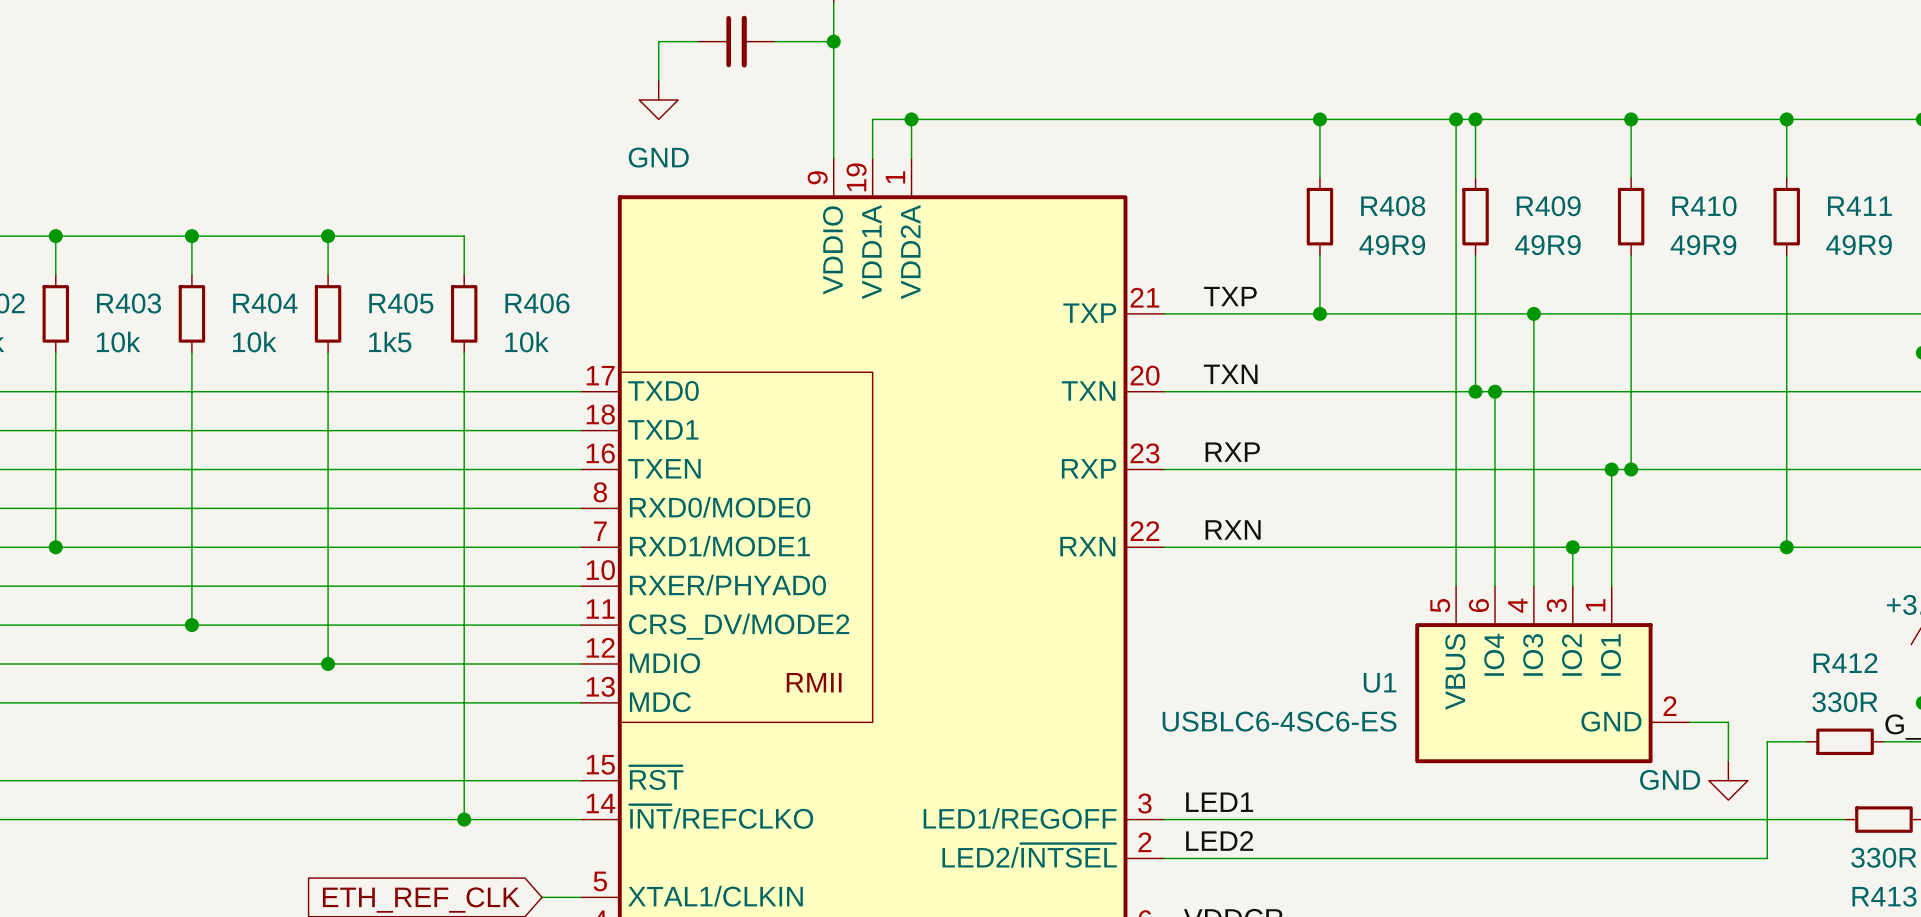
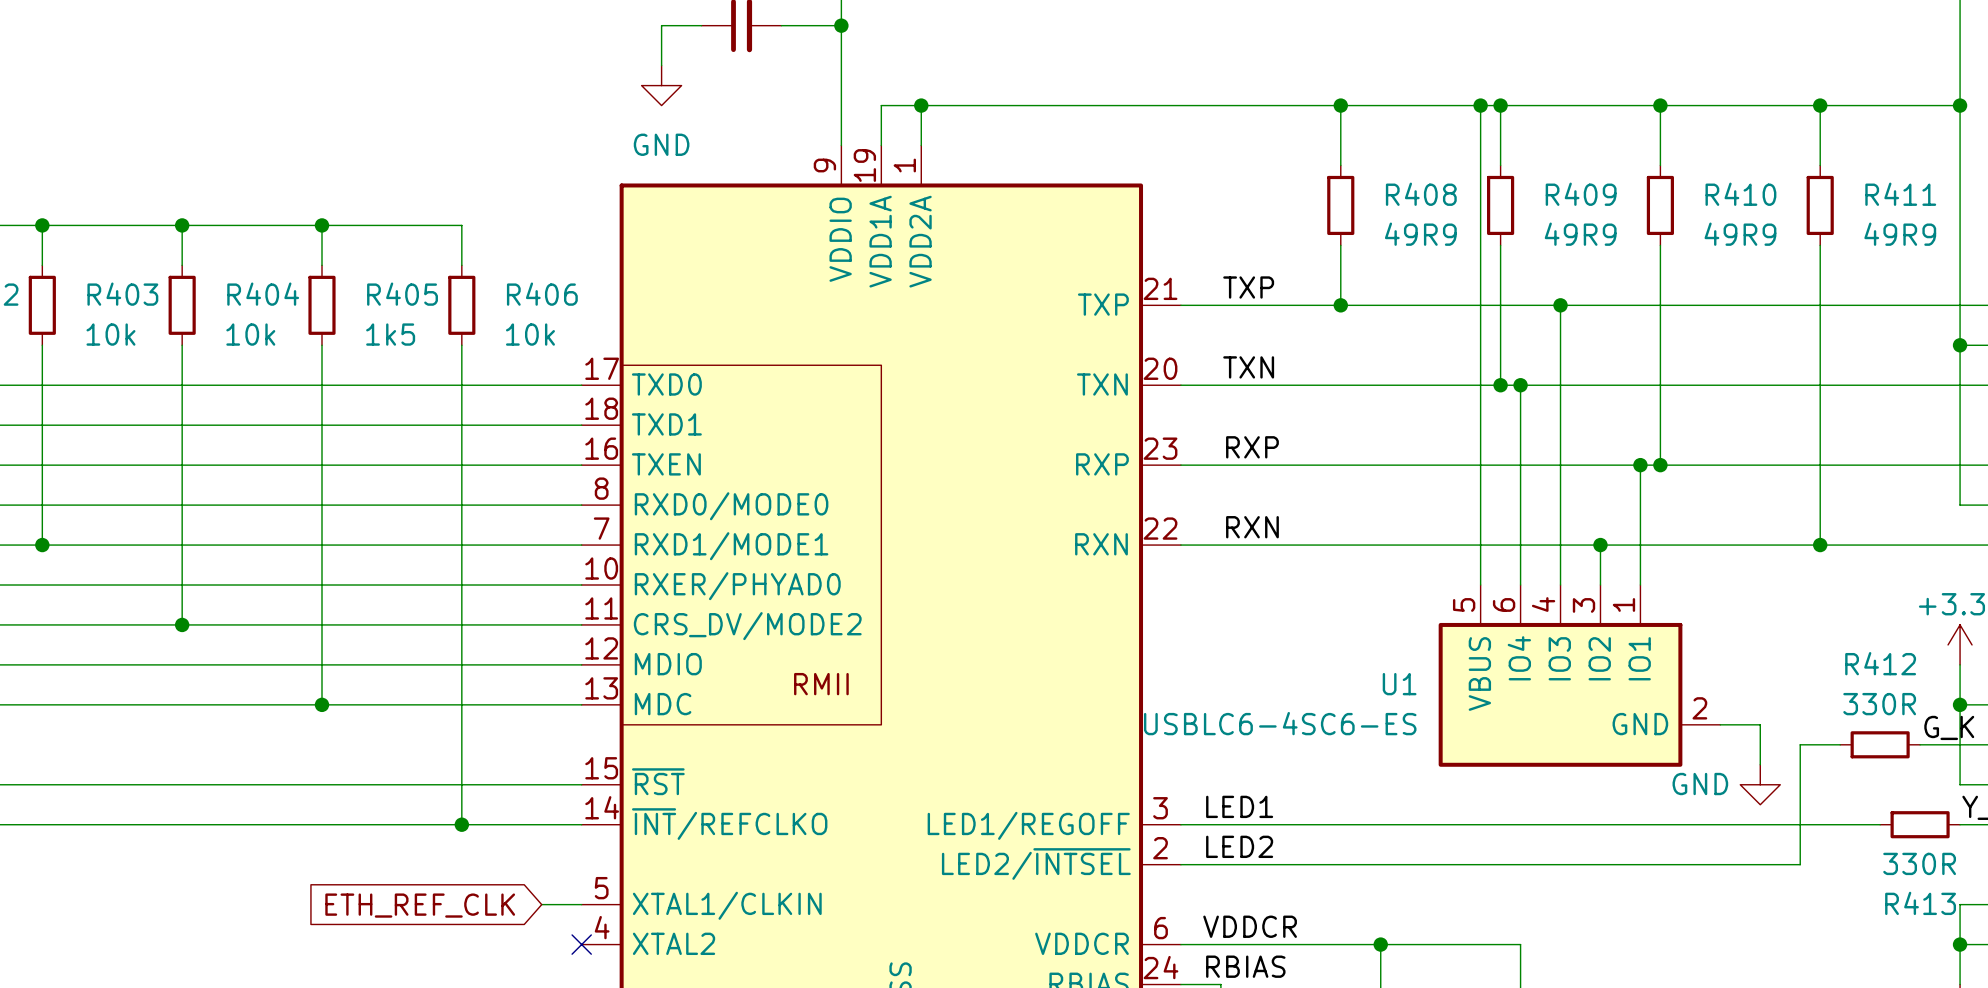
wire: none -> (322, 664) (322, 704)
junction position: (328, 663) -> (322, 704)

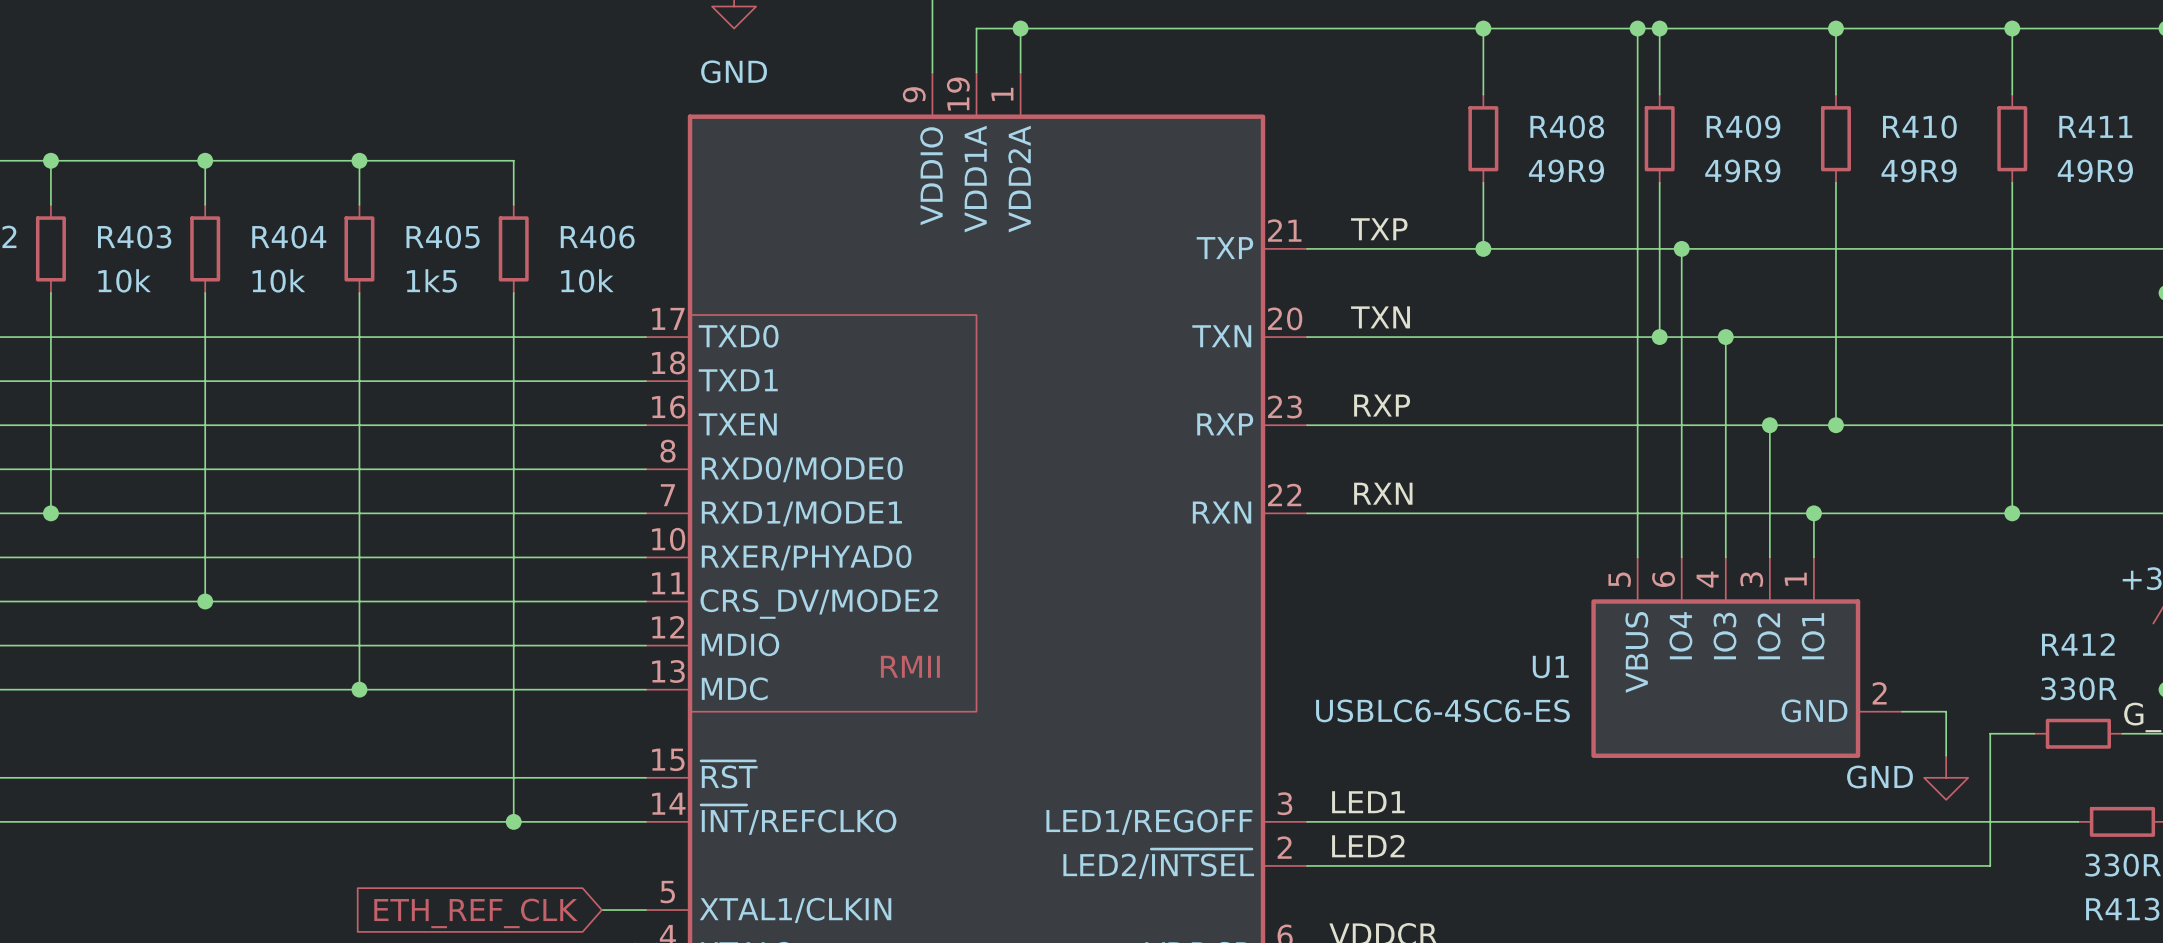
junction: none -> (1681, 248)
wire: (1560, 305) (1560, 385) -> (1681, 248) (1681, 337)
junction: (1560, 305) -> none
junction: (1520, 385) -> none
junction: none -> (1725, 337)
junction: none -> (1769, 425)
wire: (1640, 465) (1640, 545) -> (1769, 425) (1769, 513)
junction: (1640, 465) -> none
junction: (1600, 545) -> none
junction: none -> (1813, 513)

